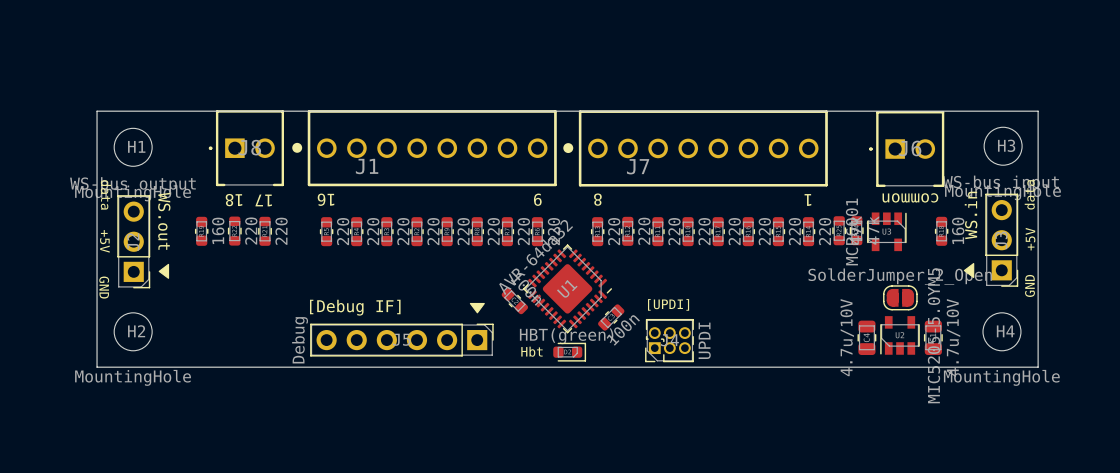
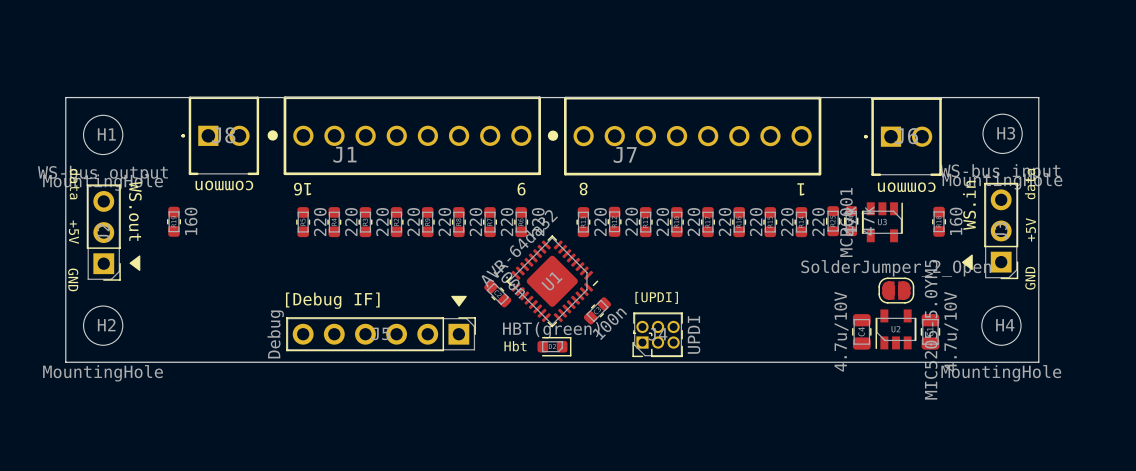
text: none -> common (224, 185)
text: 18 (233, 200) -> none
text: 17 (263, 200) -> none
part: 220 (234, 231) -> none
part: 220 (265, 231) -> none

